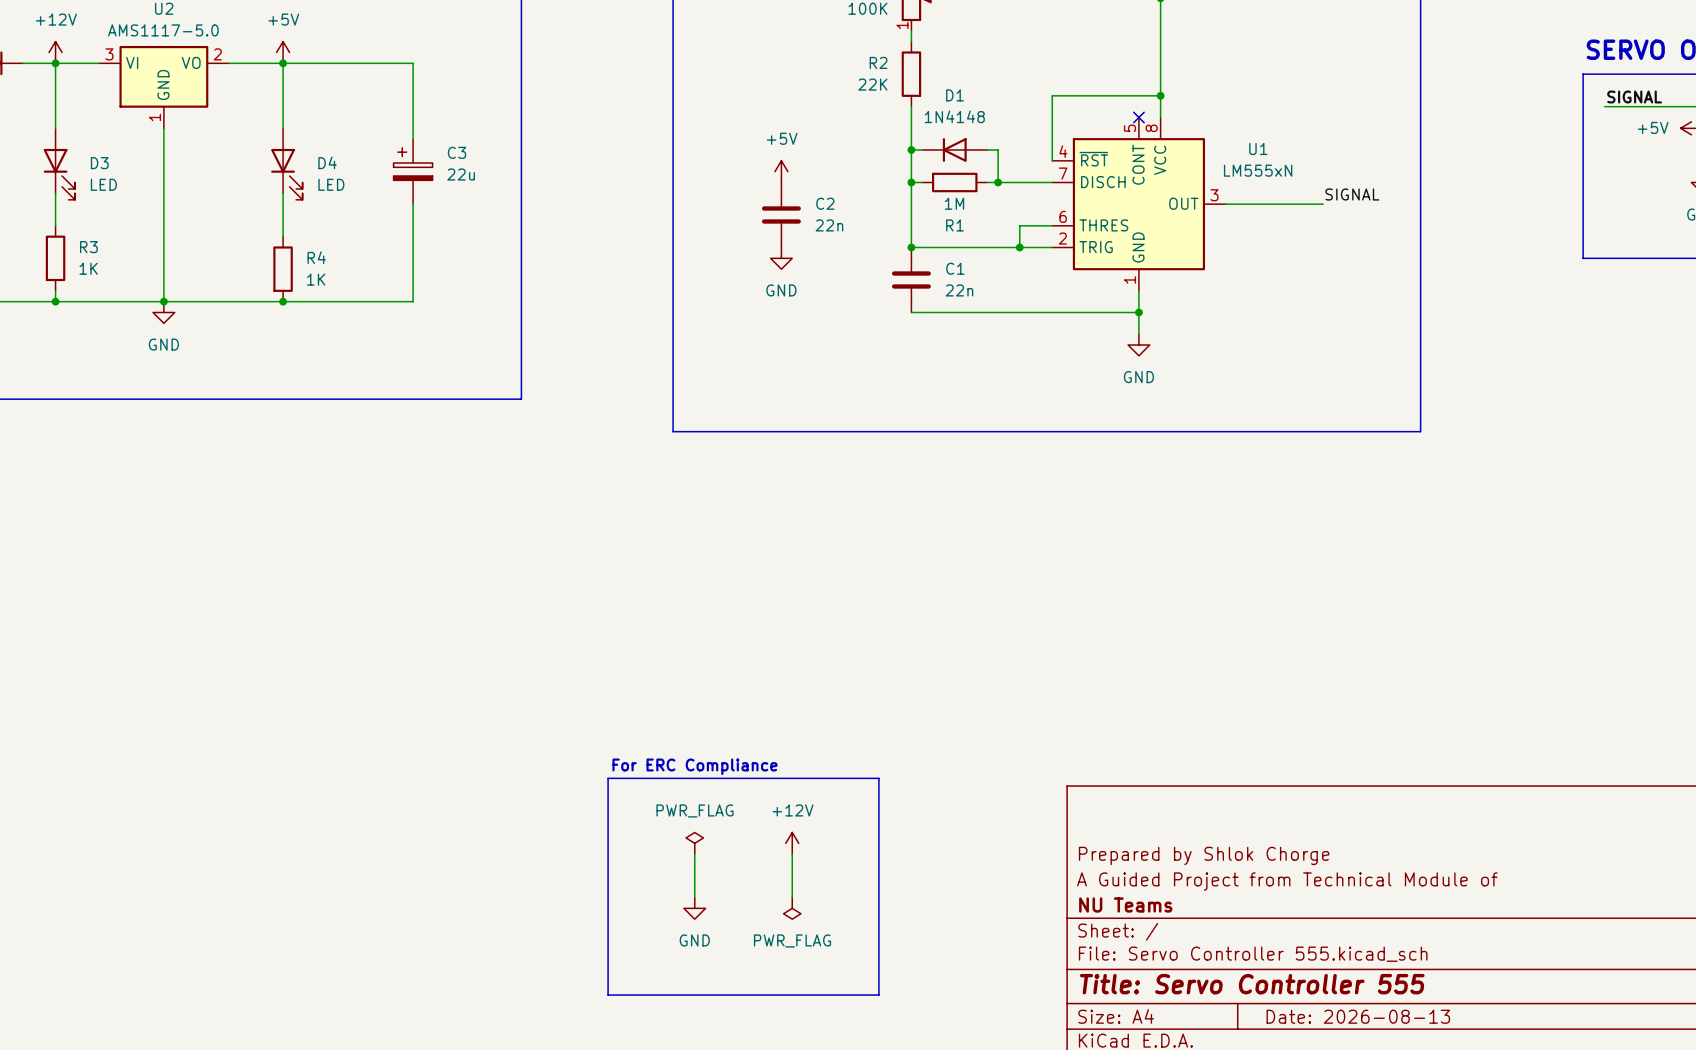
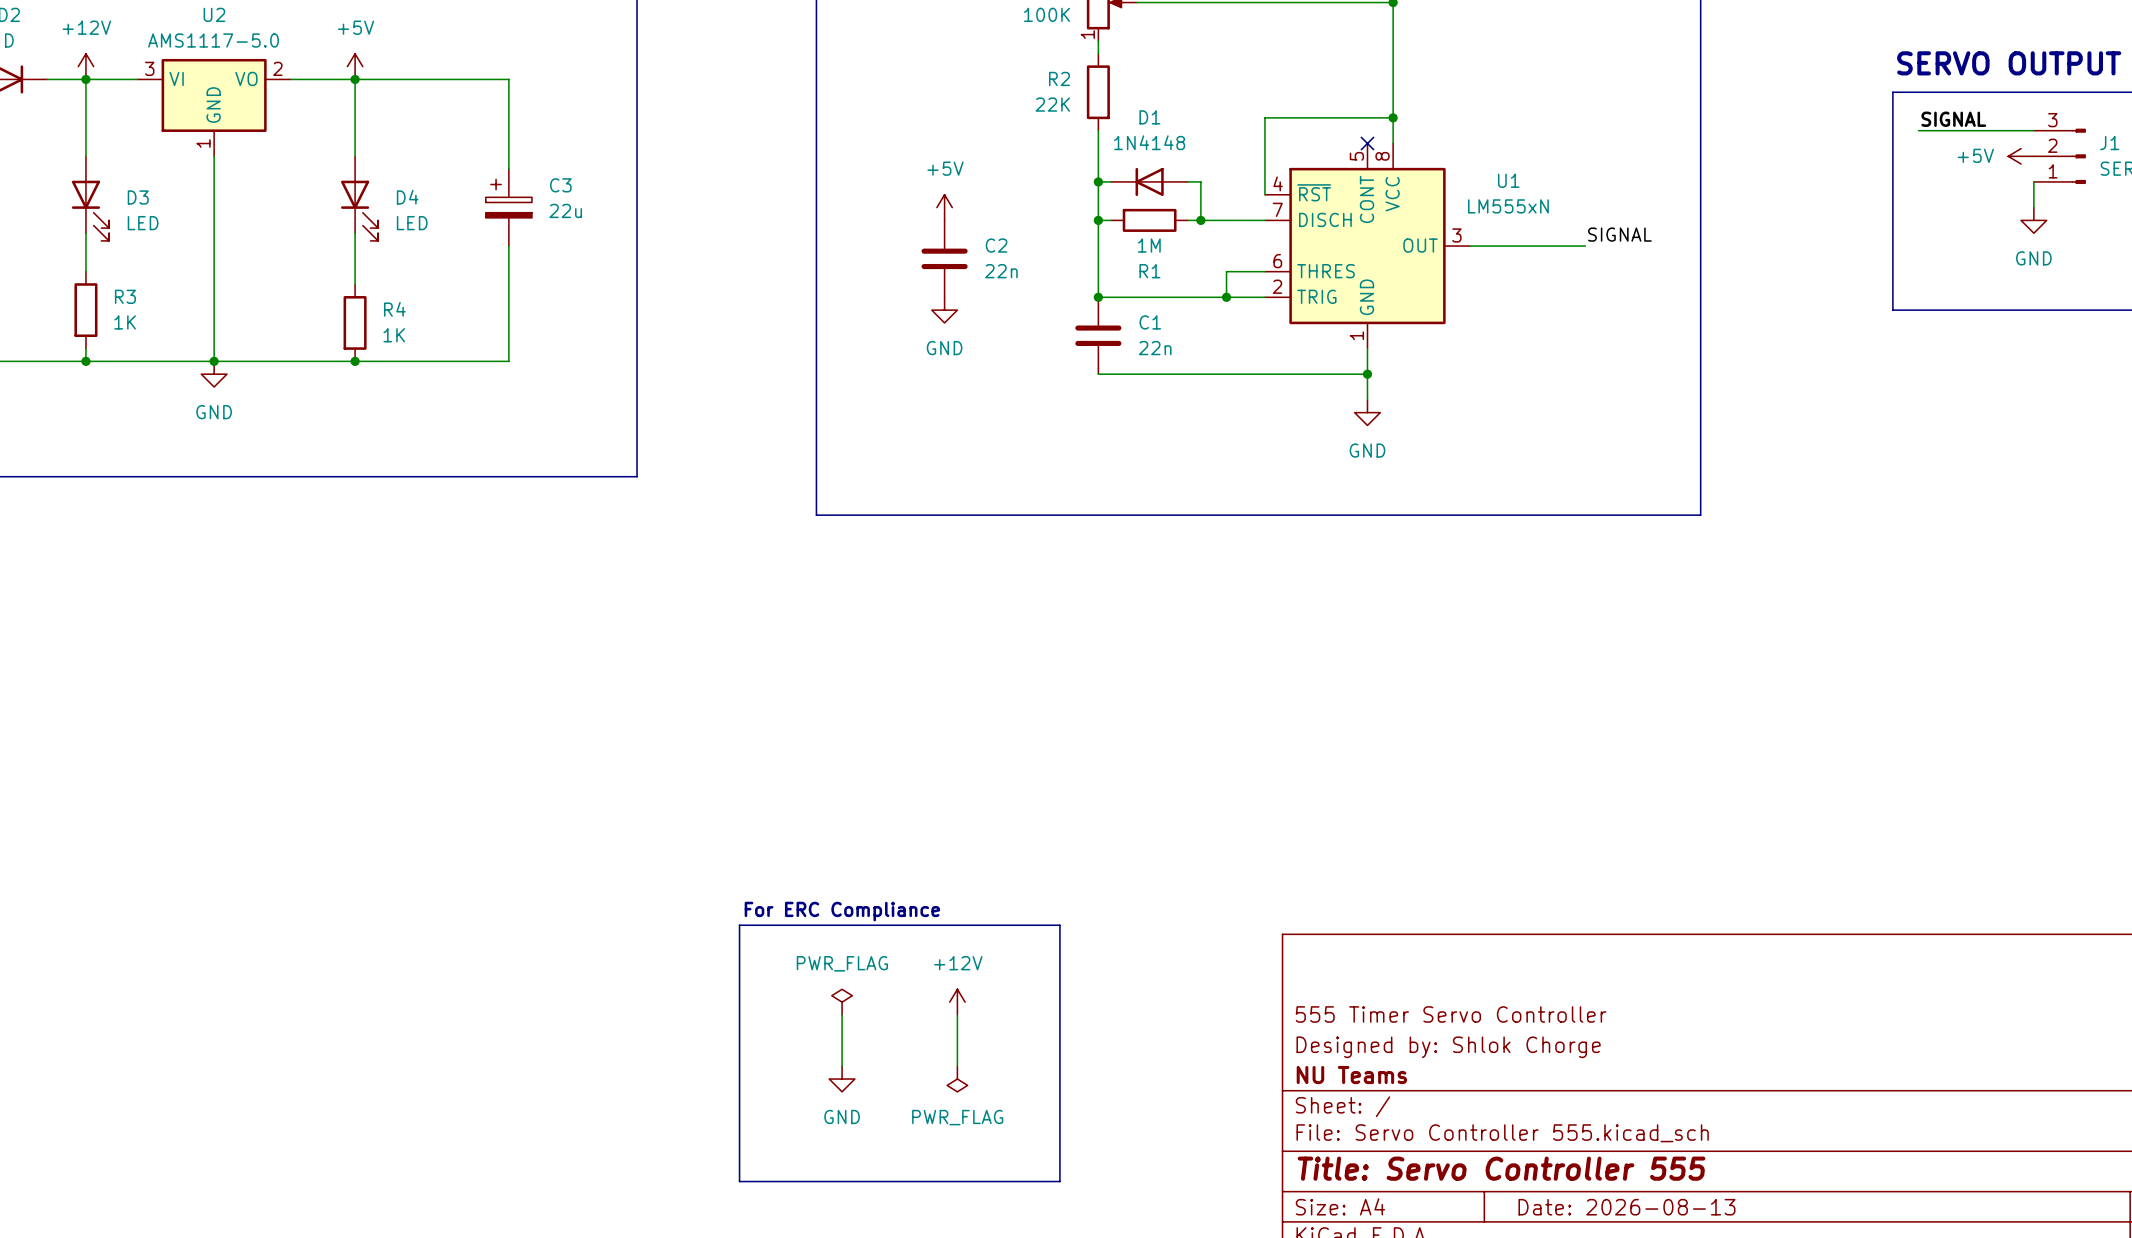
title block: Prepared by Shlok Chorge (1204, 855) -> 555 Timer Servo Controller (1451, 1014)
title block: A Guided Project from Technical Module of (1287, 881) -> Designed by: Shlok Chorge (1448, 1047)

